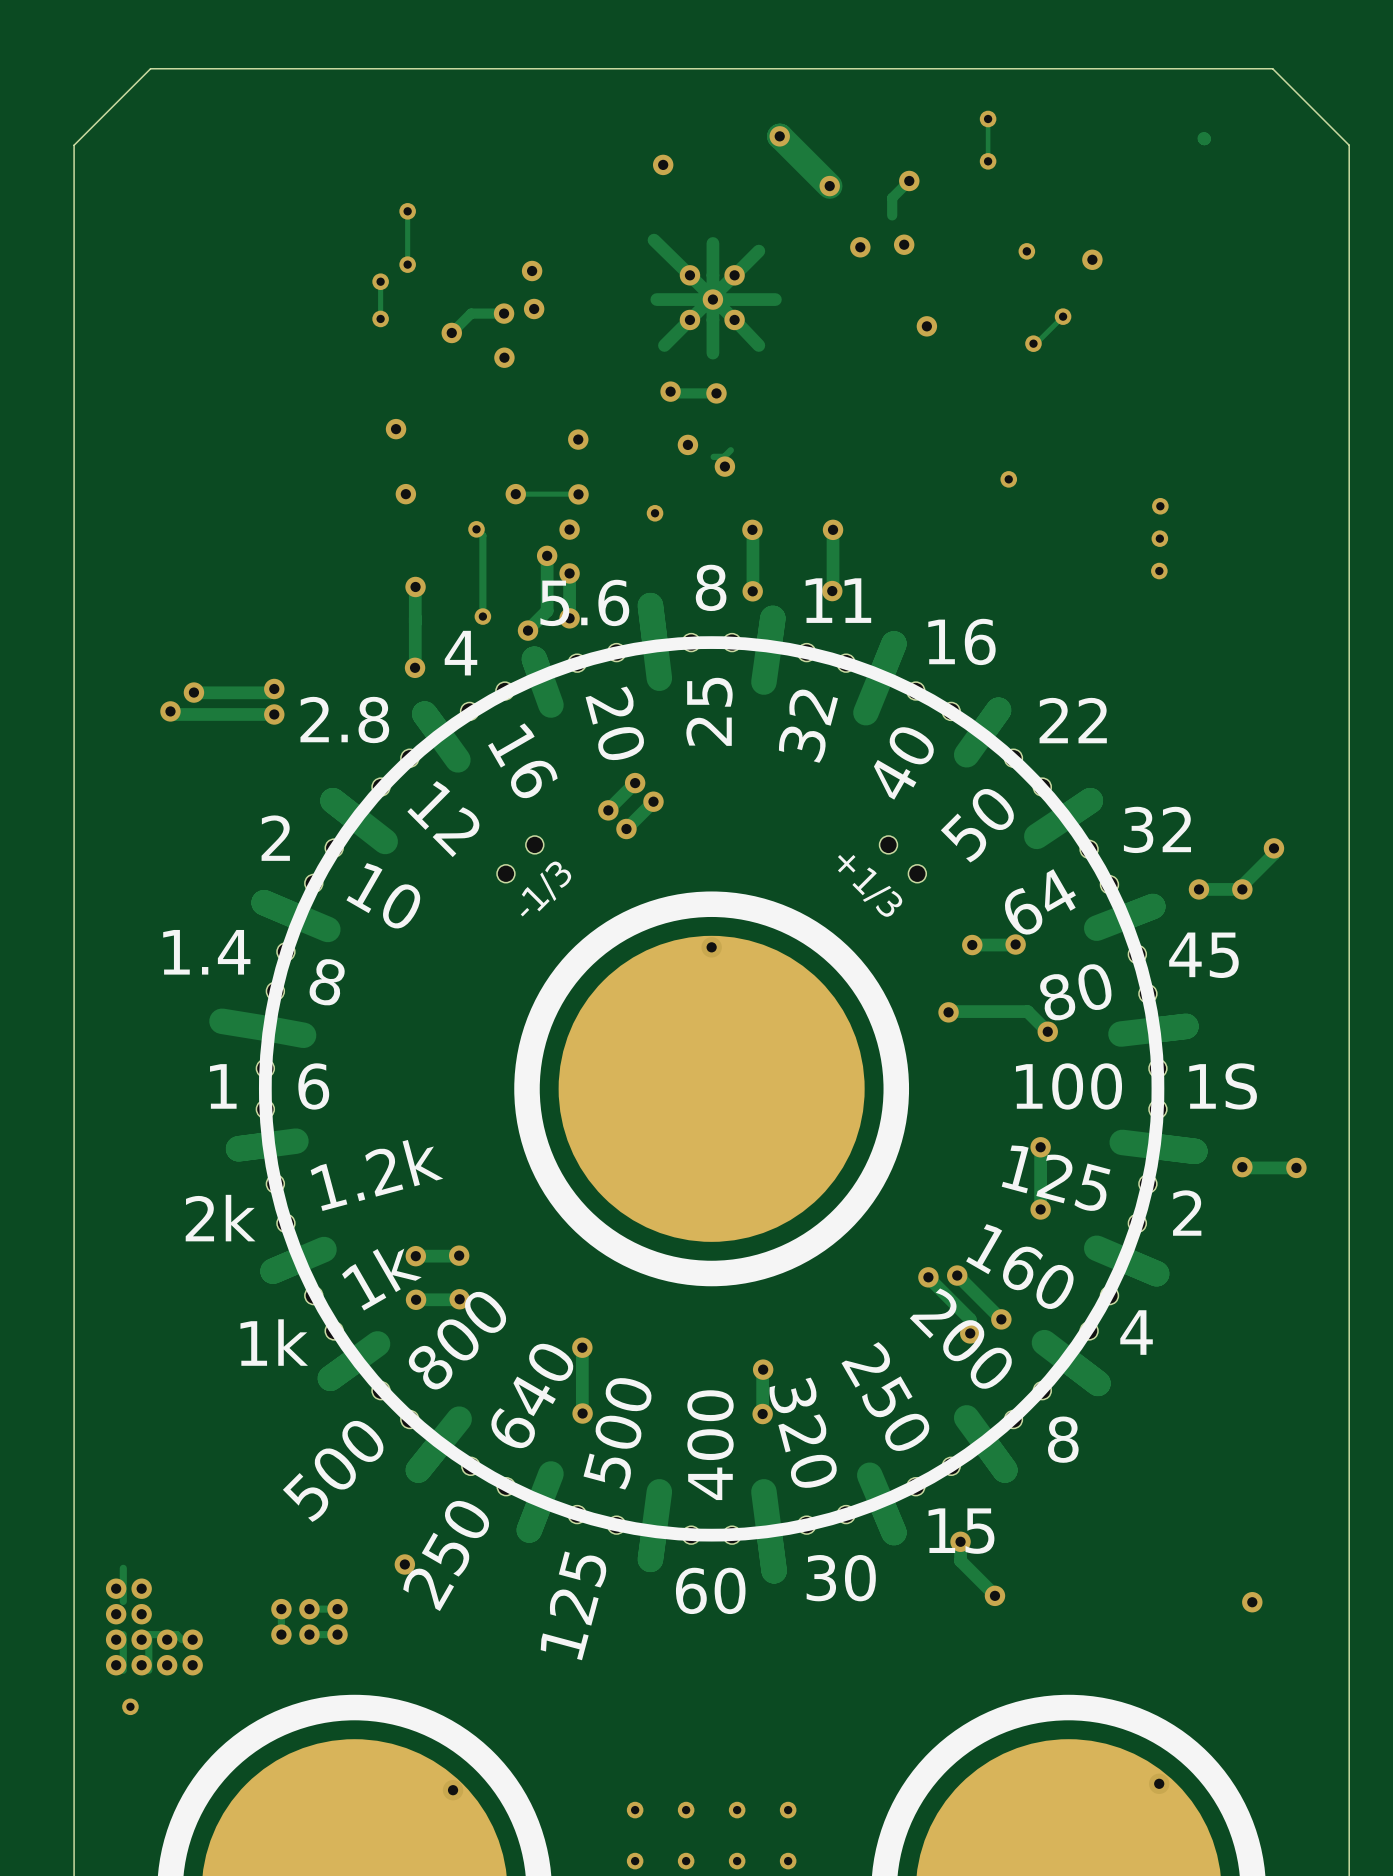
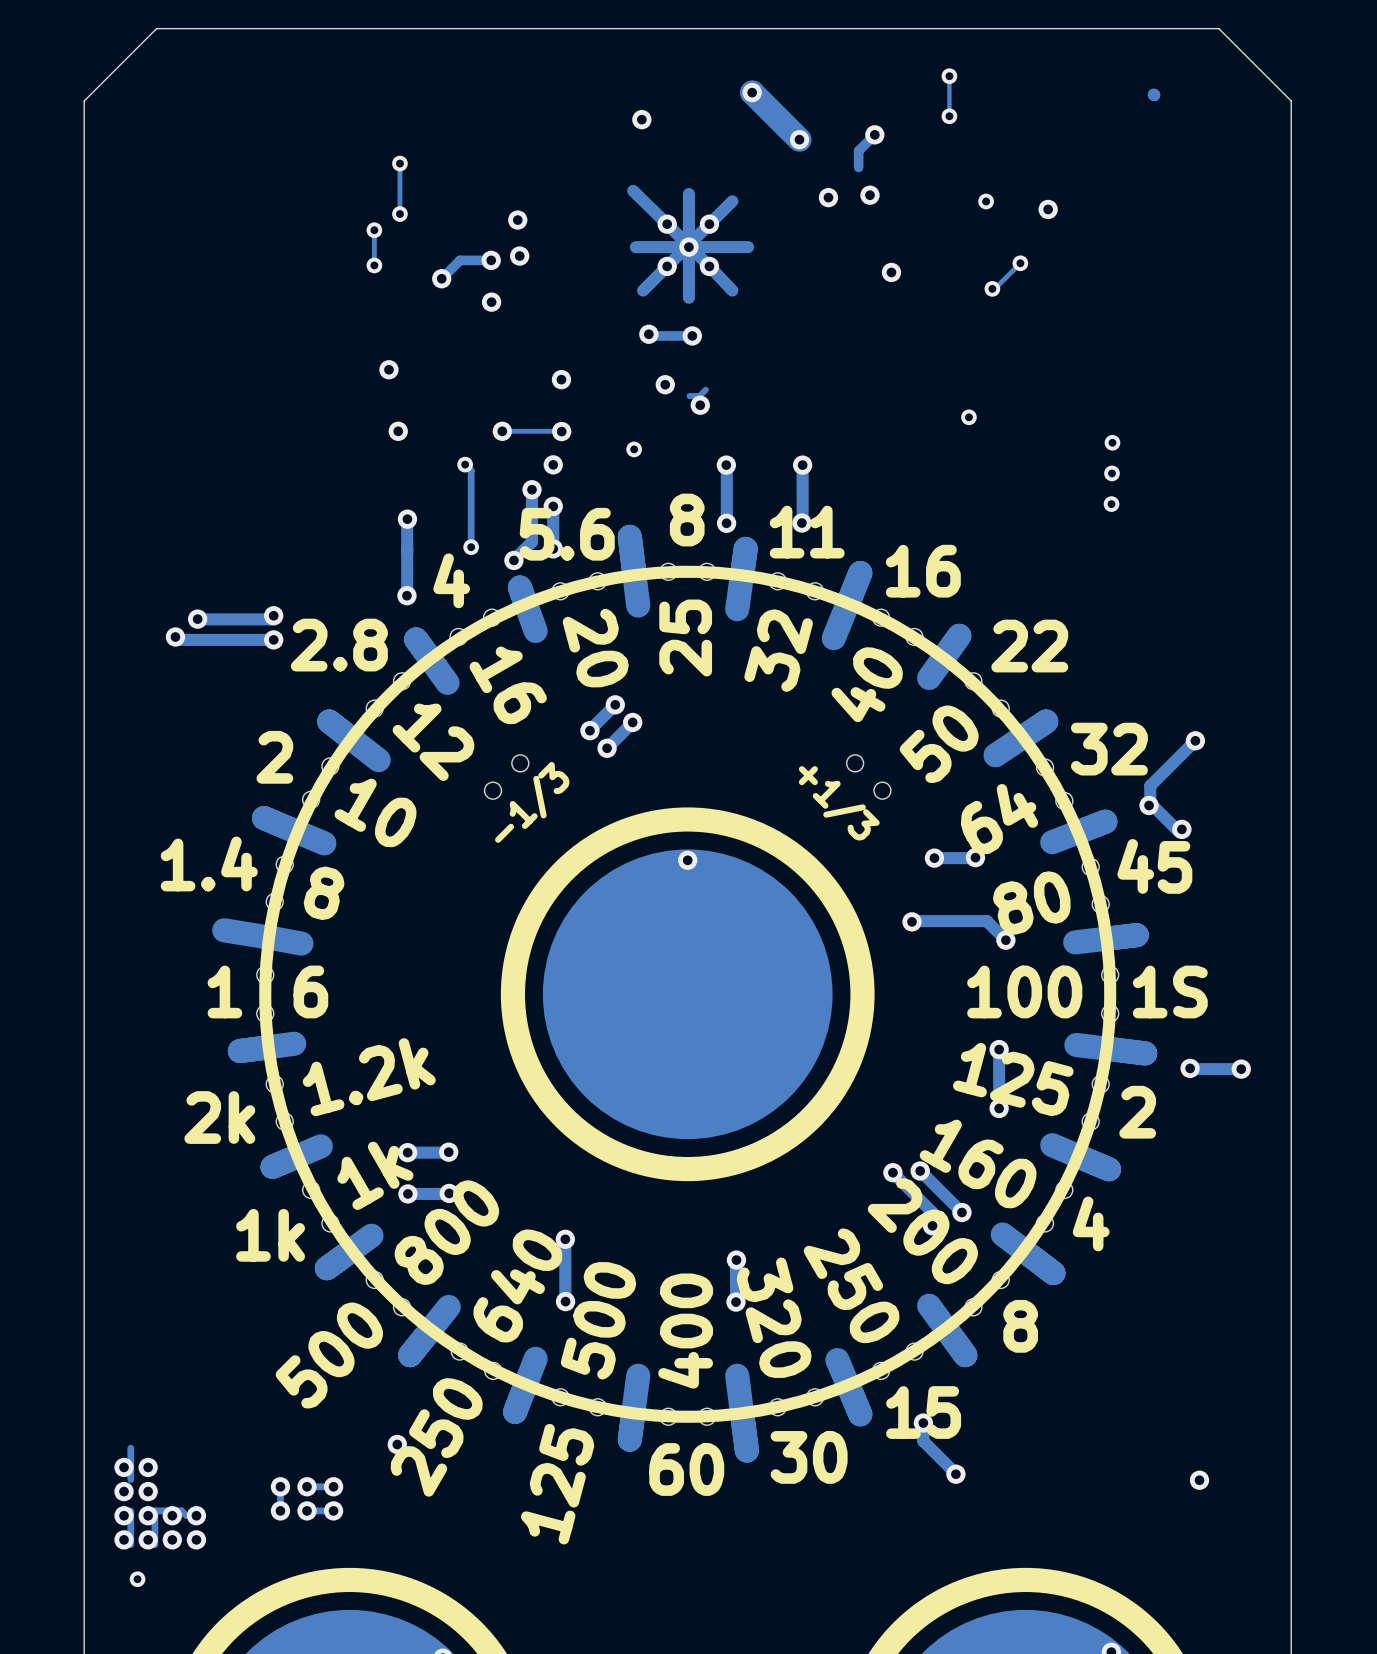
track: none -> (1195, 740) (1150, 785) (1150, 803) (1176, 829) (1181, 829)
via: none -> (1195, 740)
track: (1273, 848) (1273, 853) (1242, 885) (1242, 889) (1198, 889) -> none
via: (1273, 848) -> none
via position: (1242, 889) -> (1181, 829)

